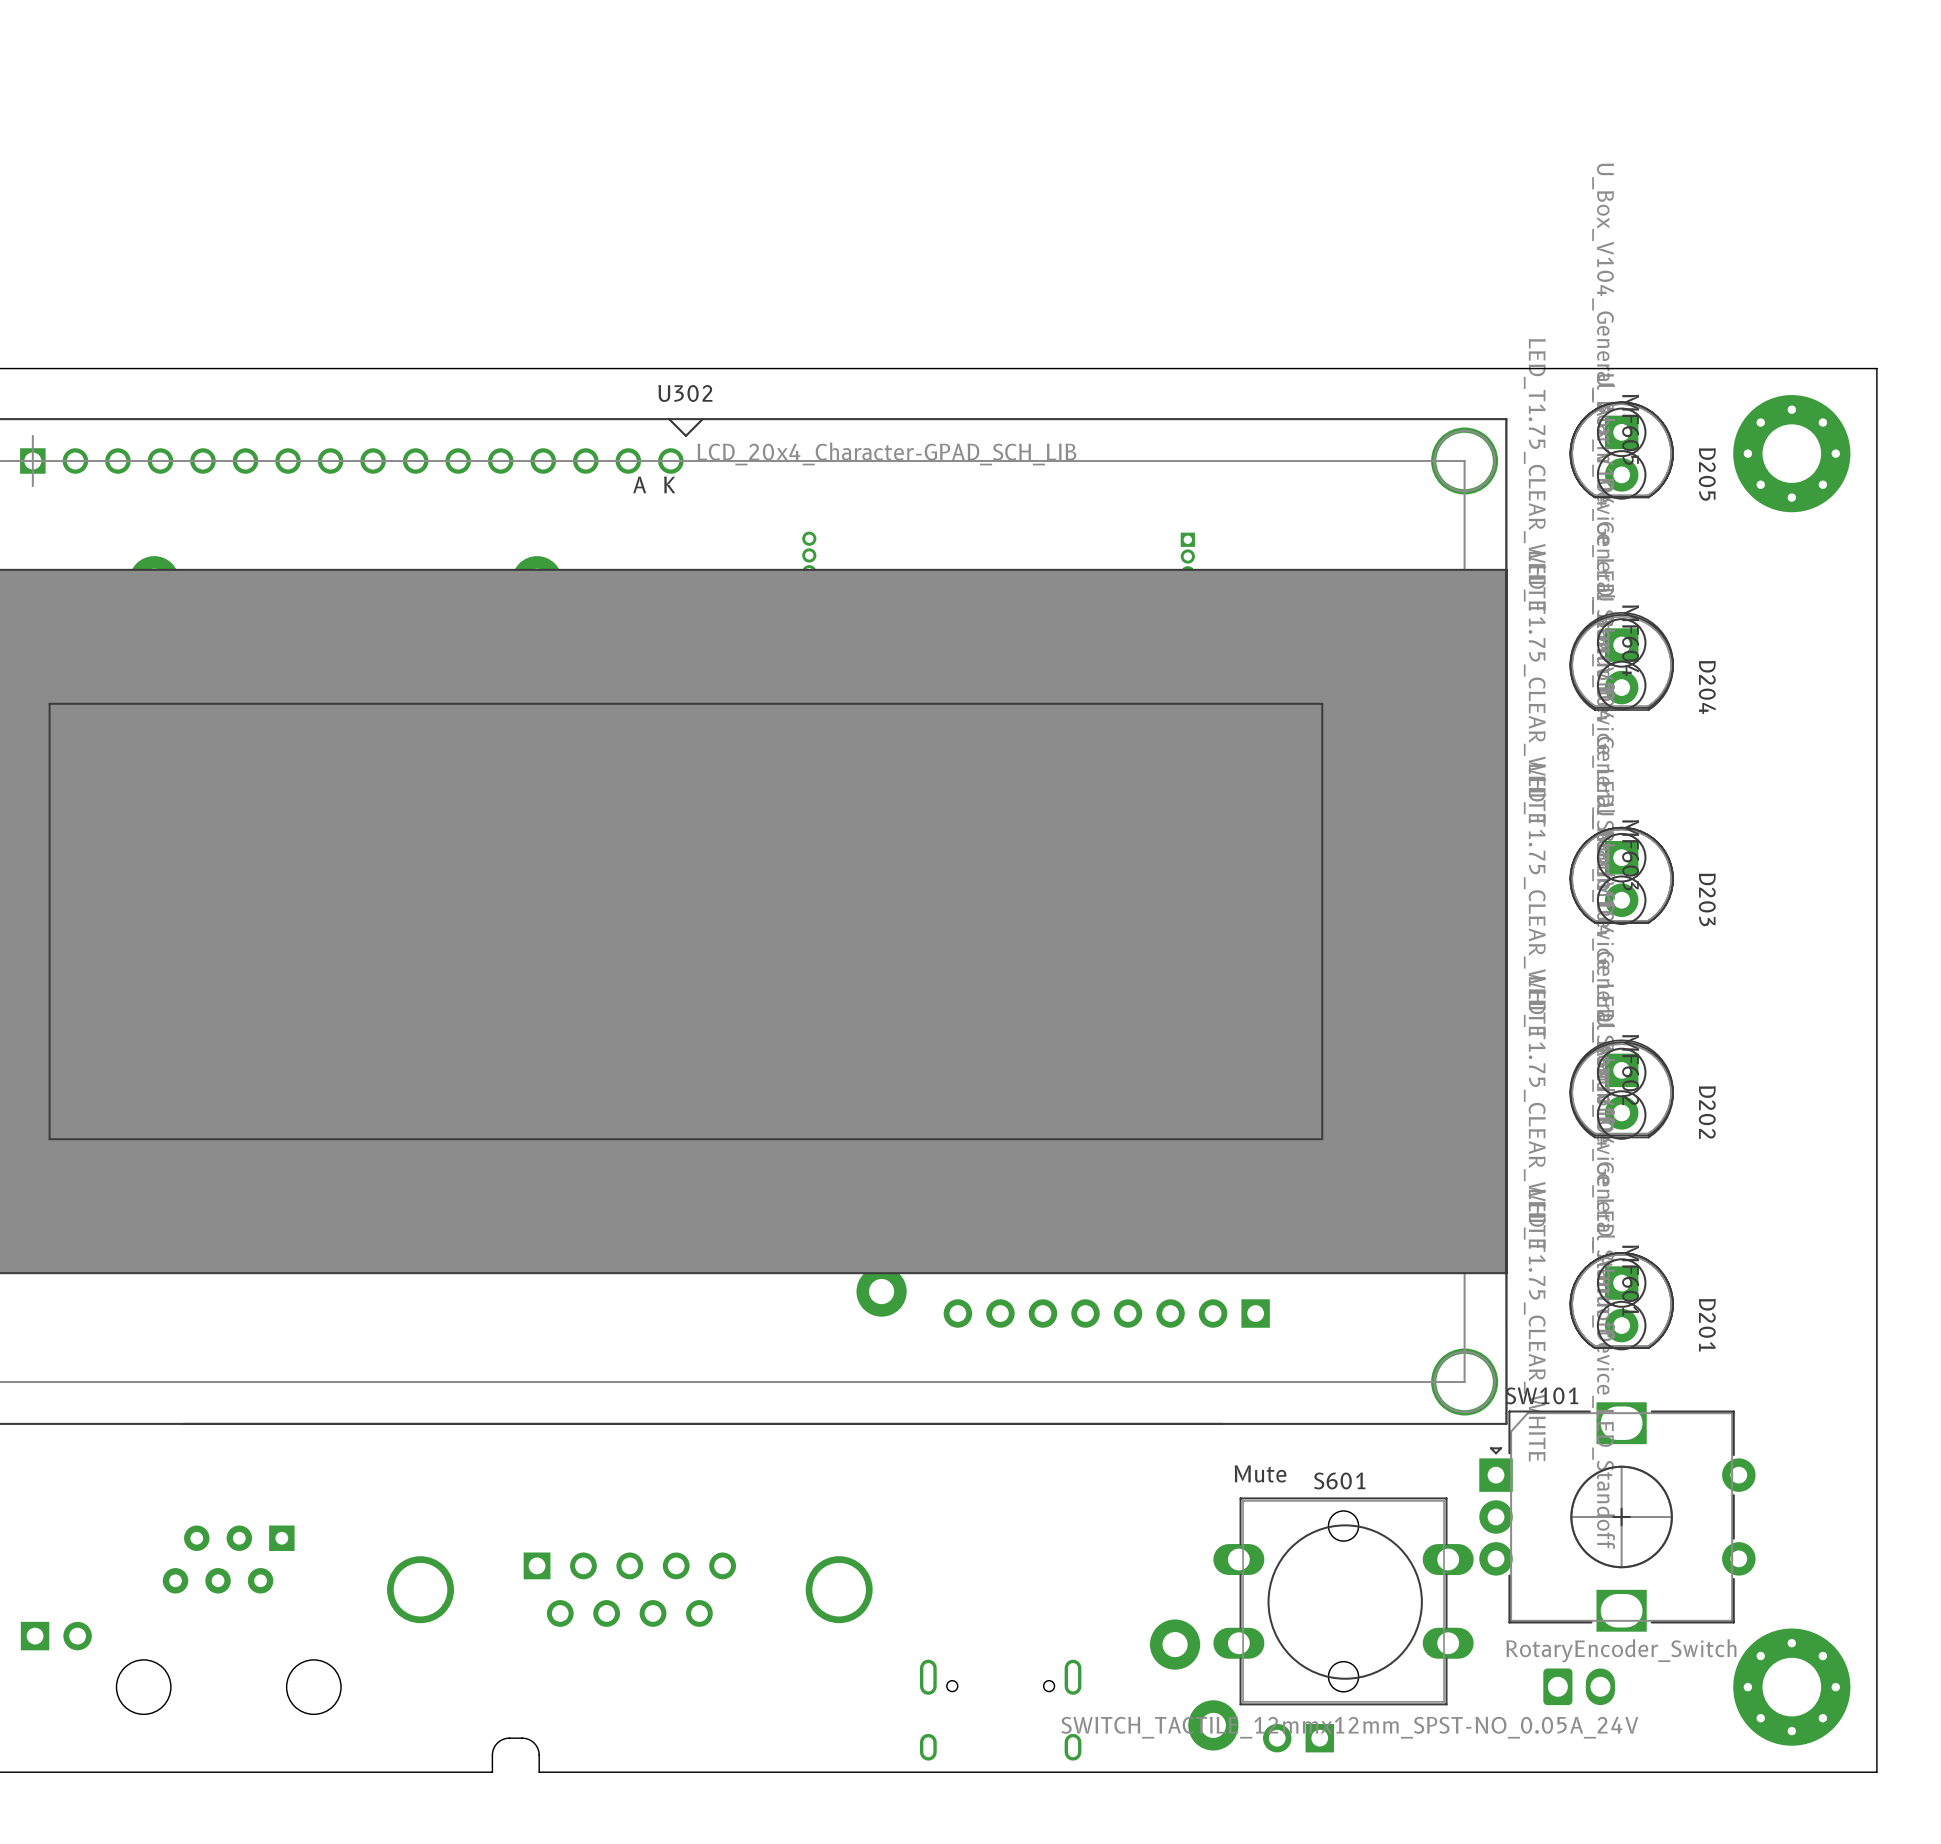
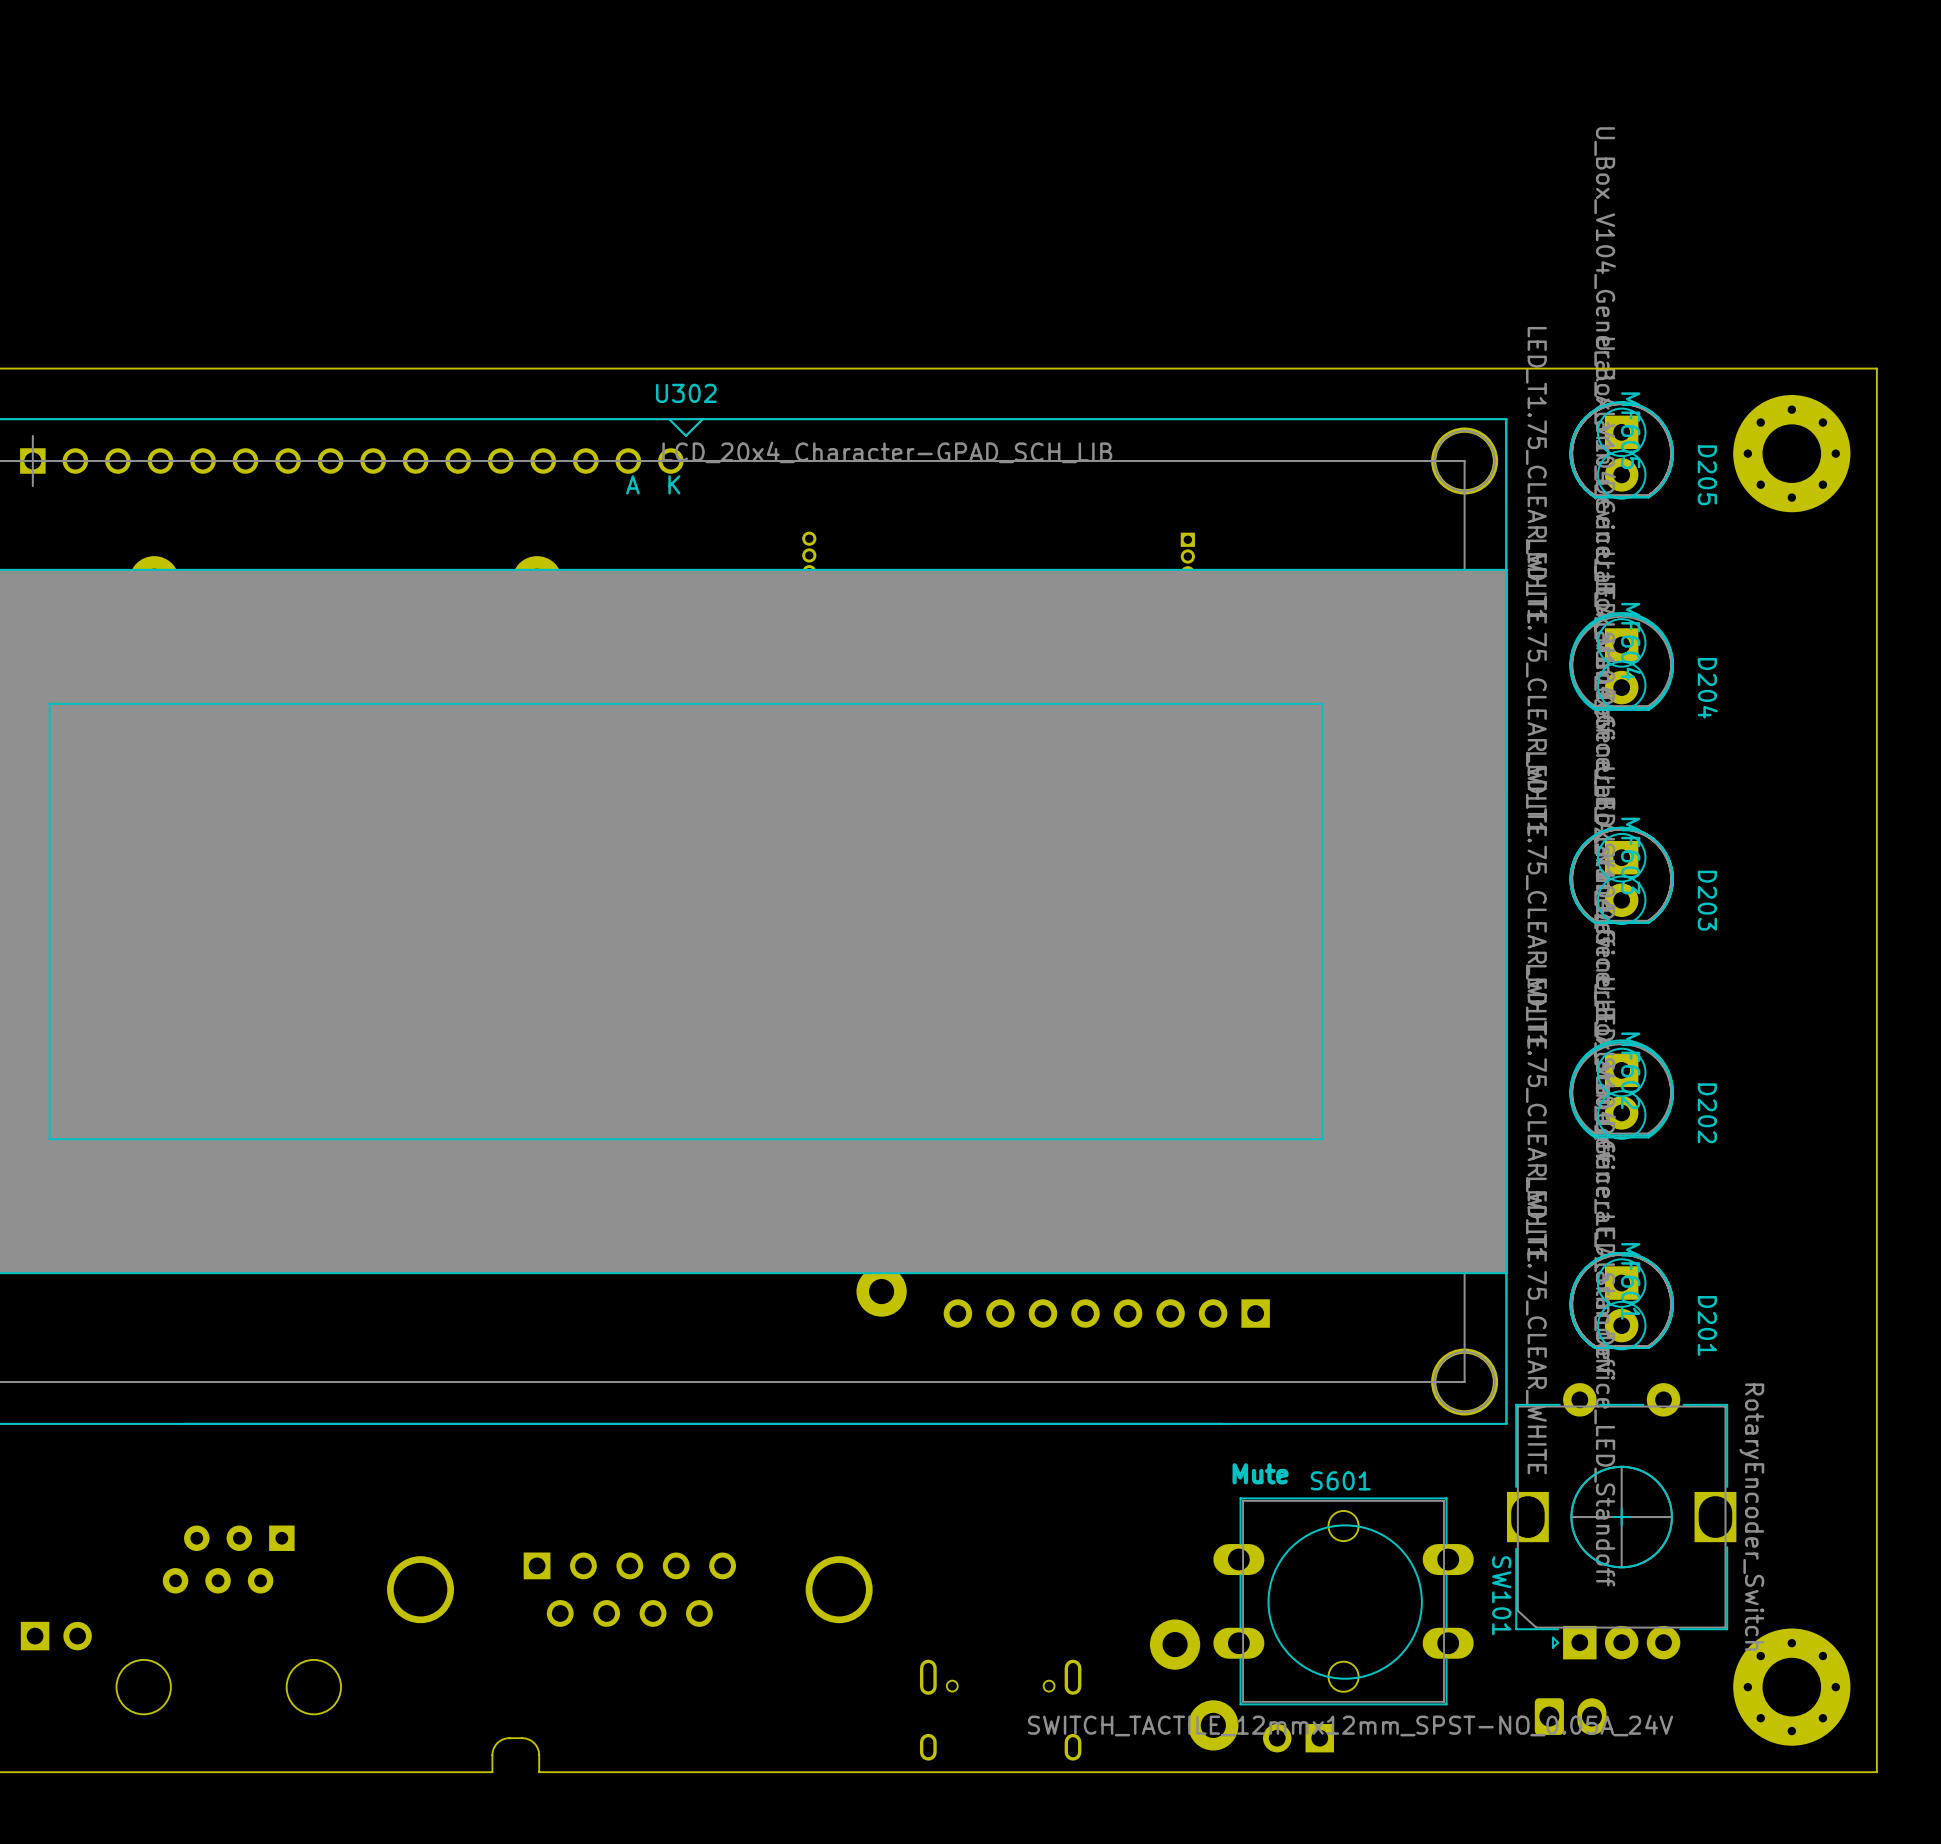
SW101 rotation: 0° (1617, 1516) -> 90° counterclockwise (1621, 1521)
part position: (1579, 1686) -> (1570, 1716)

